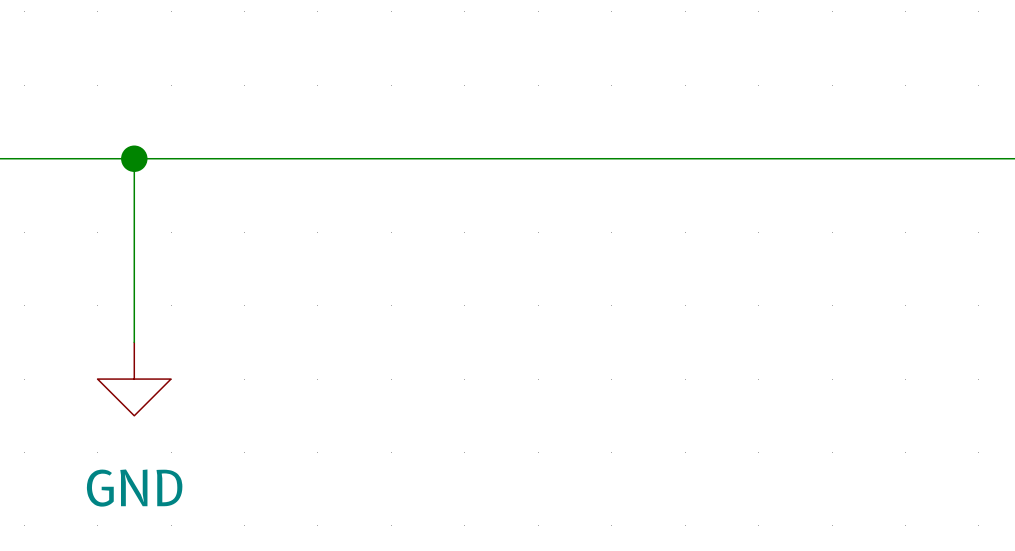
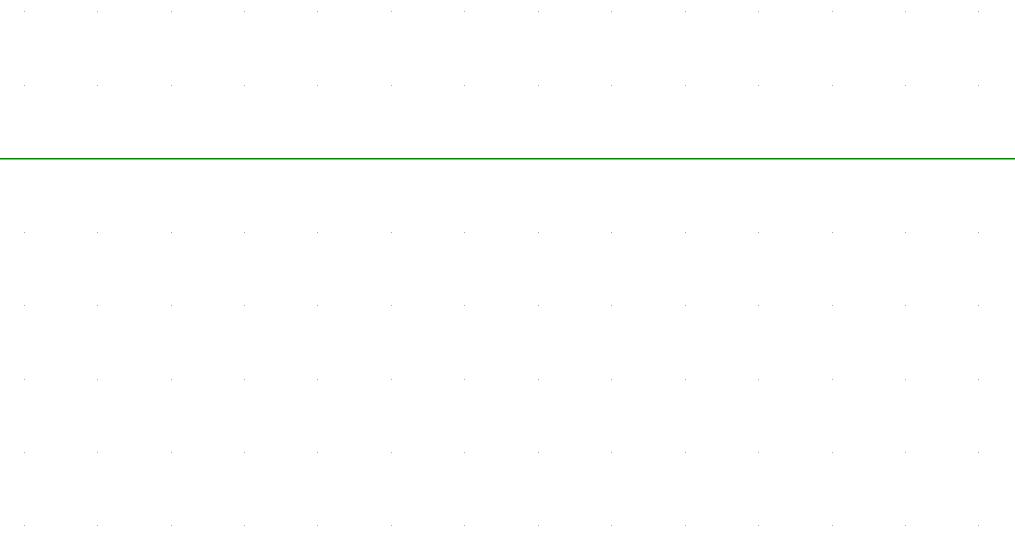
wire: (134, 158) (134, 342) -> none
junction: (134, 158) -> none
power symbol: GND (134, 379) -> none

